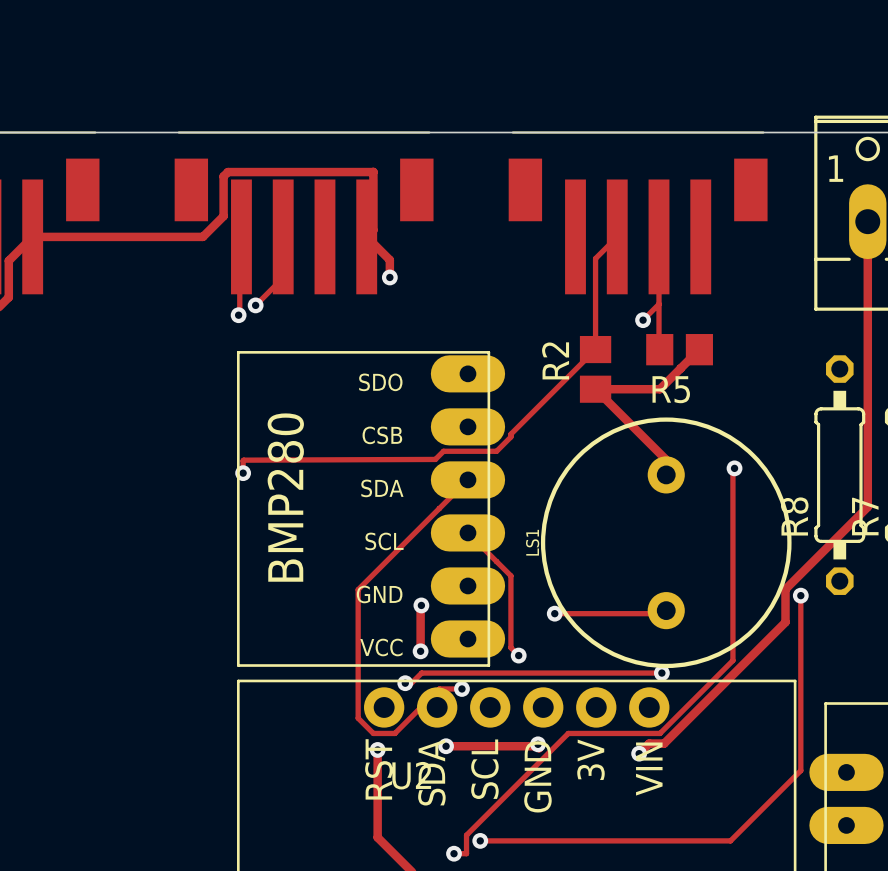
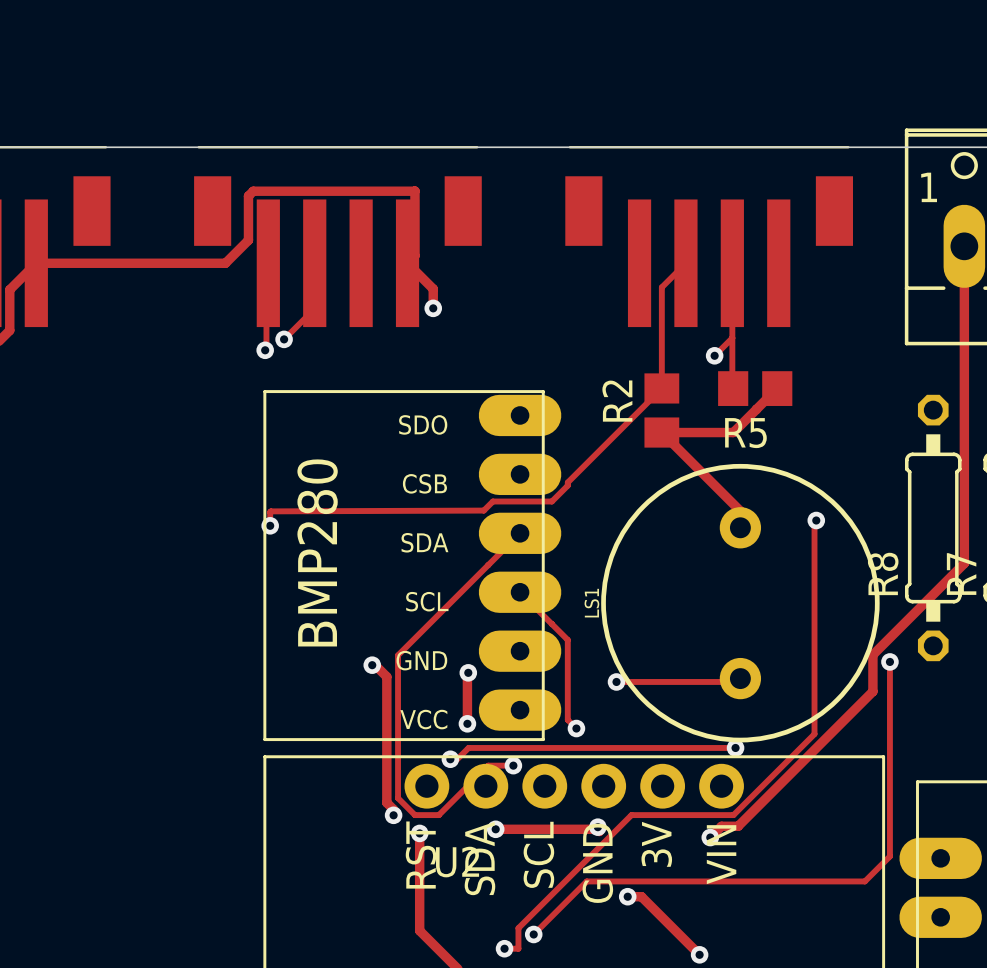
track: none -> (372, 665) (373, 663) (386, 676) (386, 802) (393, 809) (393, 815)
via: none -> (372, 665)
via: none -> (393, 815)
track: (778, 793) (730, 840) (480, 840) -> (864, 881) (586, 881) (533, 934)
track: none -> (627, 896) (641, 896) (699, 954)
via: none -> (627, 896)
via: none -> (699, 954)

